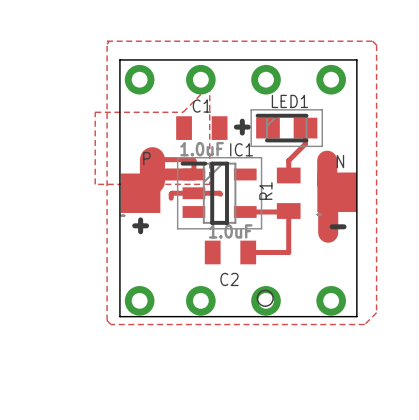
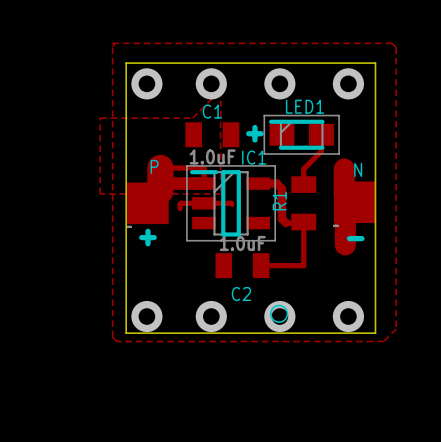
track: (245, 212) (271, 212) -> (258, 183) (276, 183) (281, 188) (281, 218) (286, 223)

